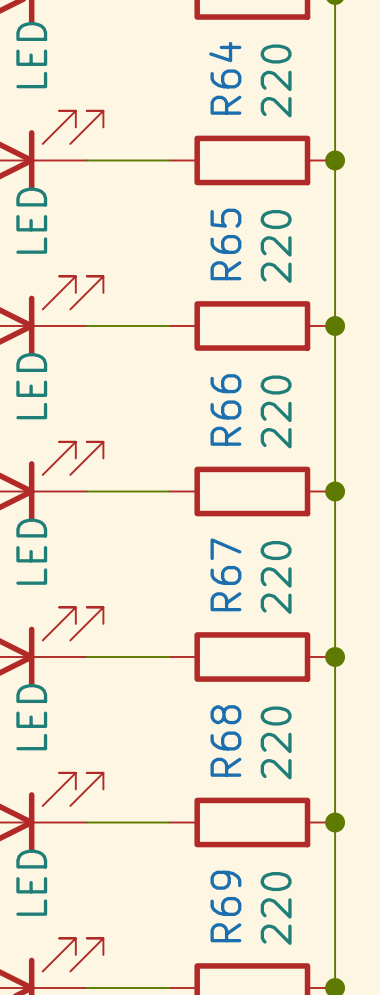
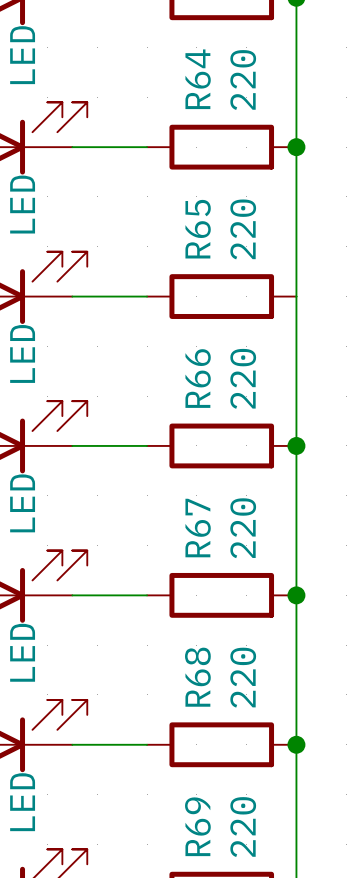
junction: (335, 325) -> none

